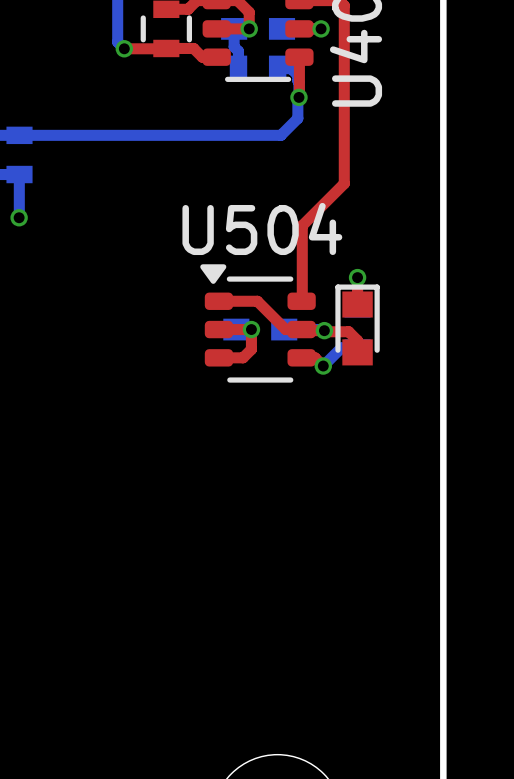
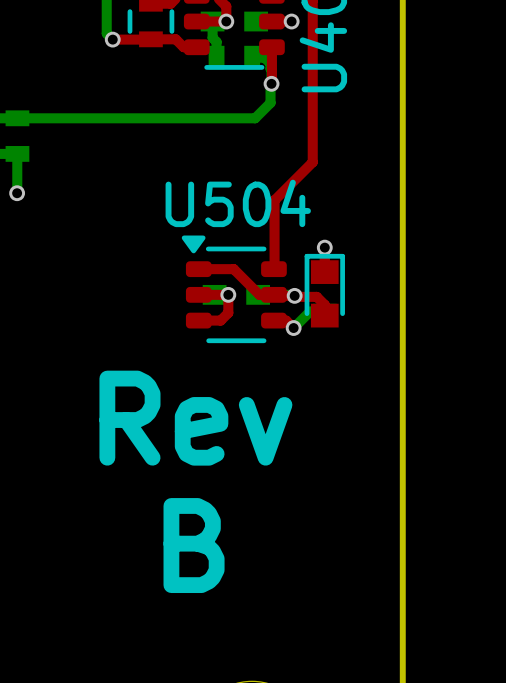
text: none -> Rev (195, 418)
text: none -> B (194, 545)

